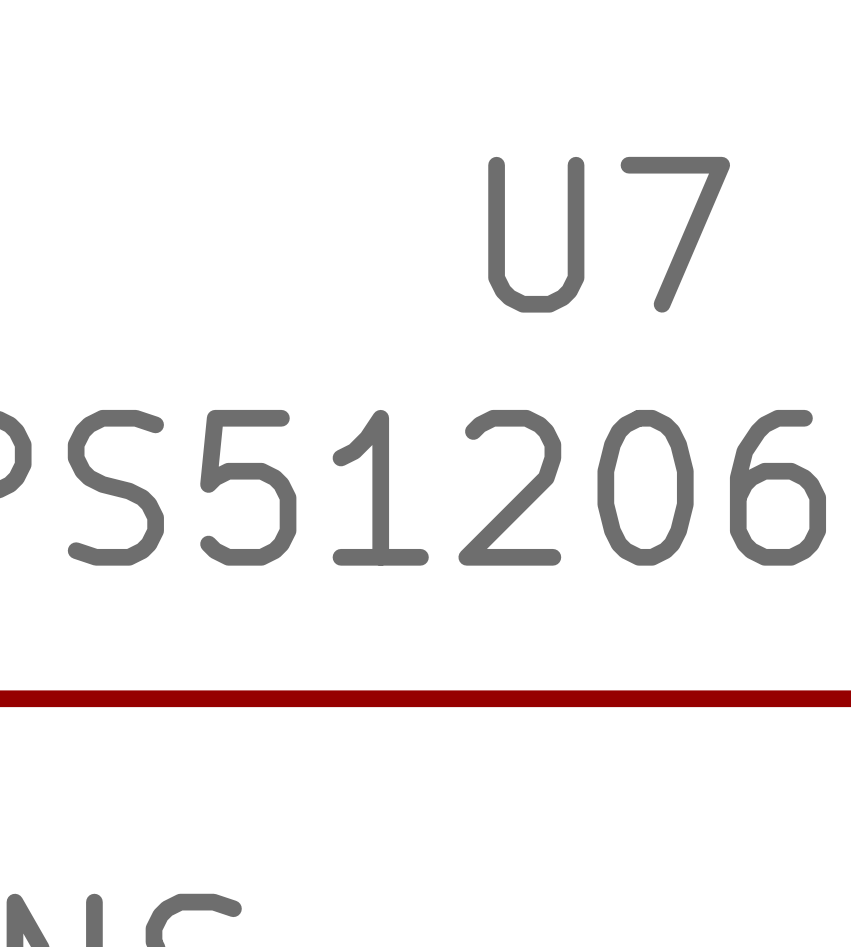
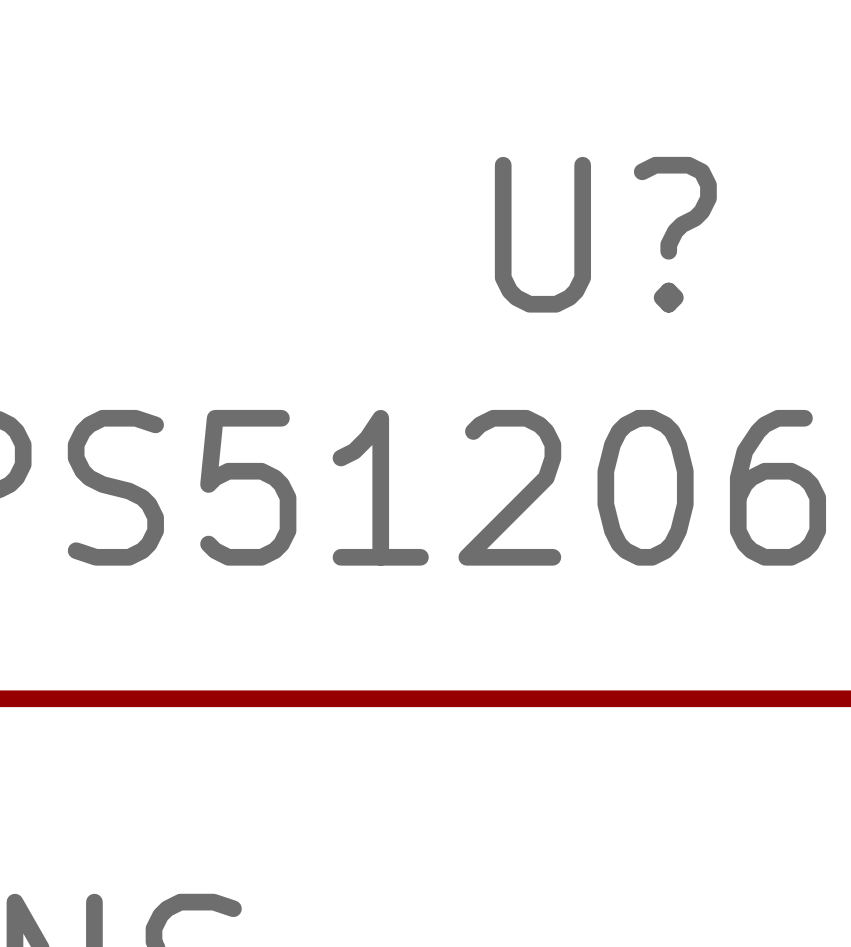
U7 name: U7 (609, 234) -> U? (605, 234)

